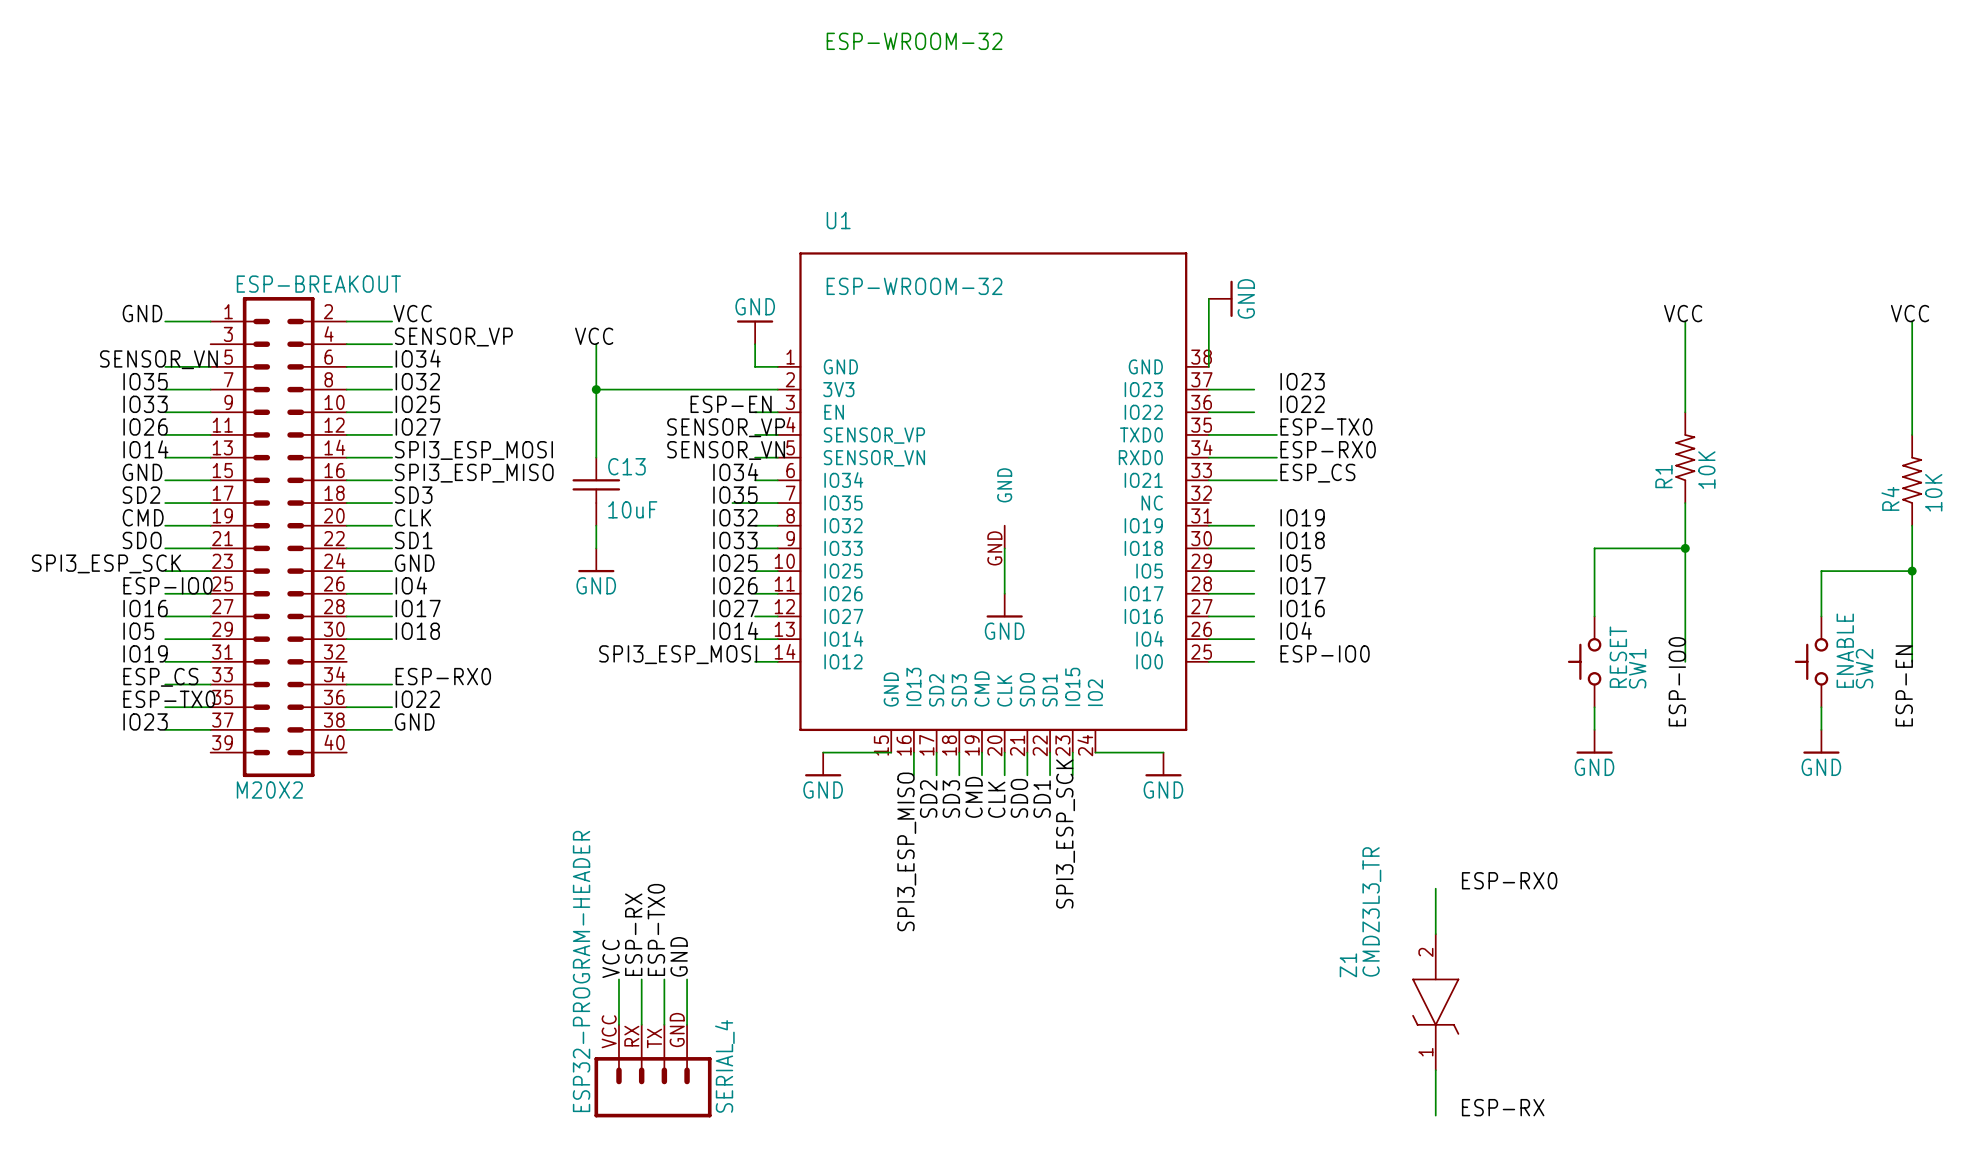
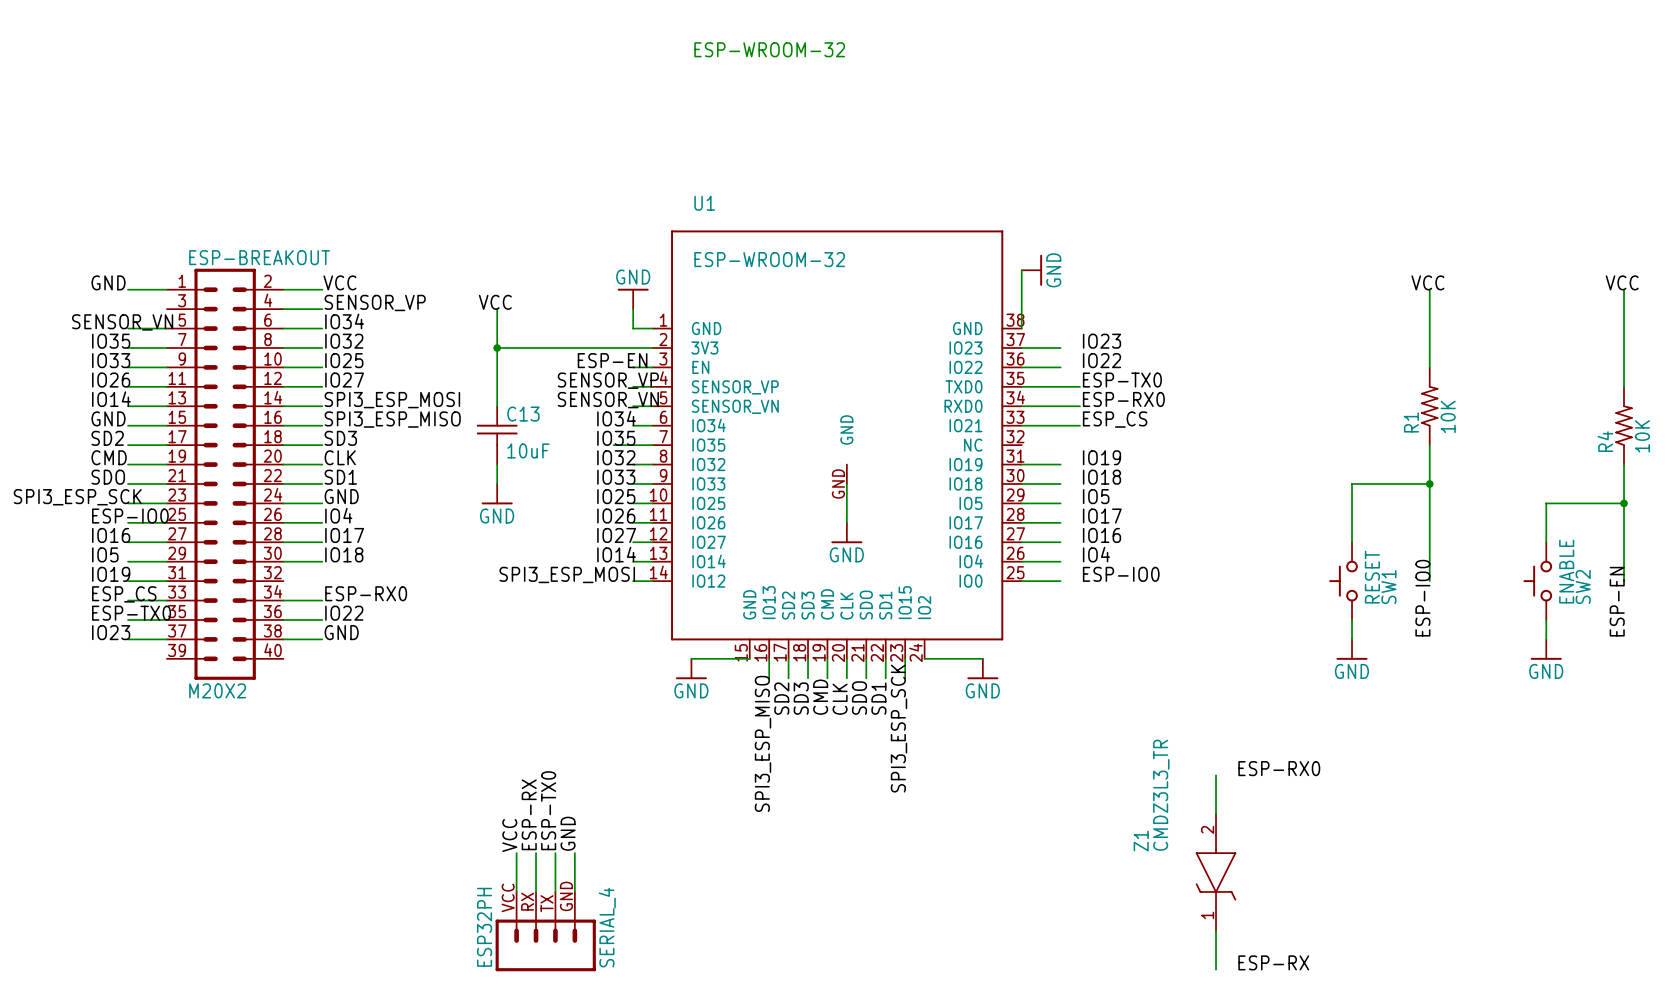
ESP32-PROGRAM-HEADER name: ESP32-PROGRAM-HEADER (581, 971) -> ESP32PH (484, 927)

